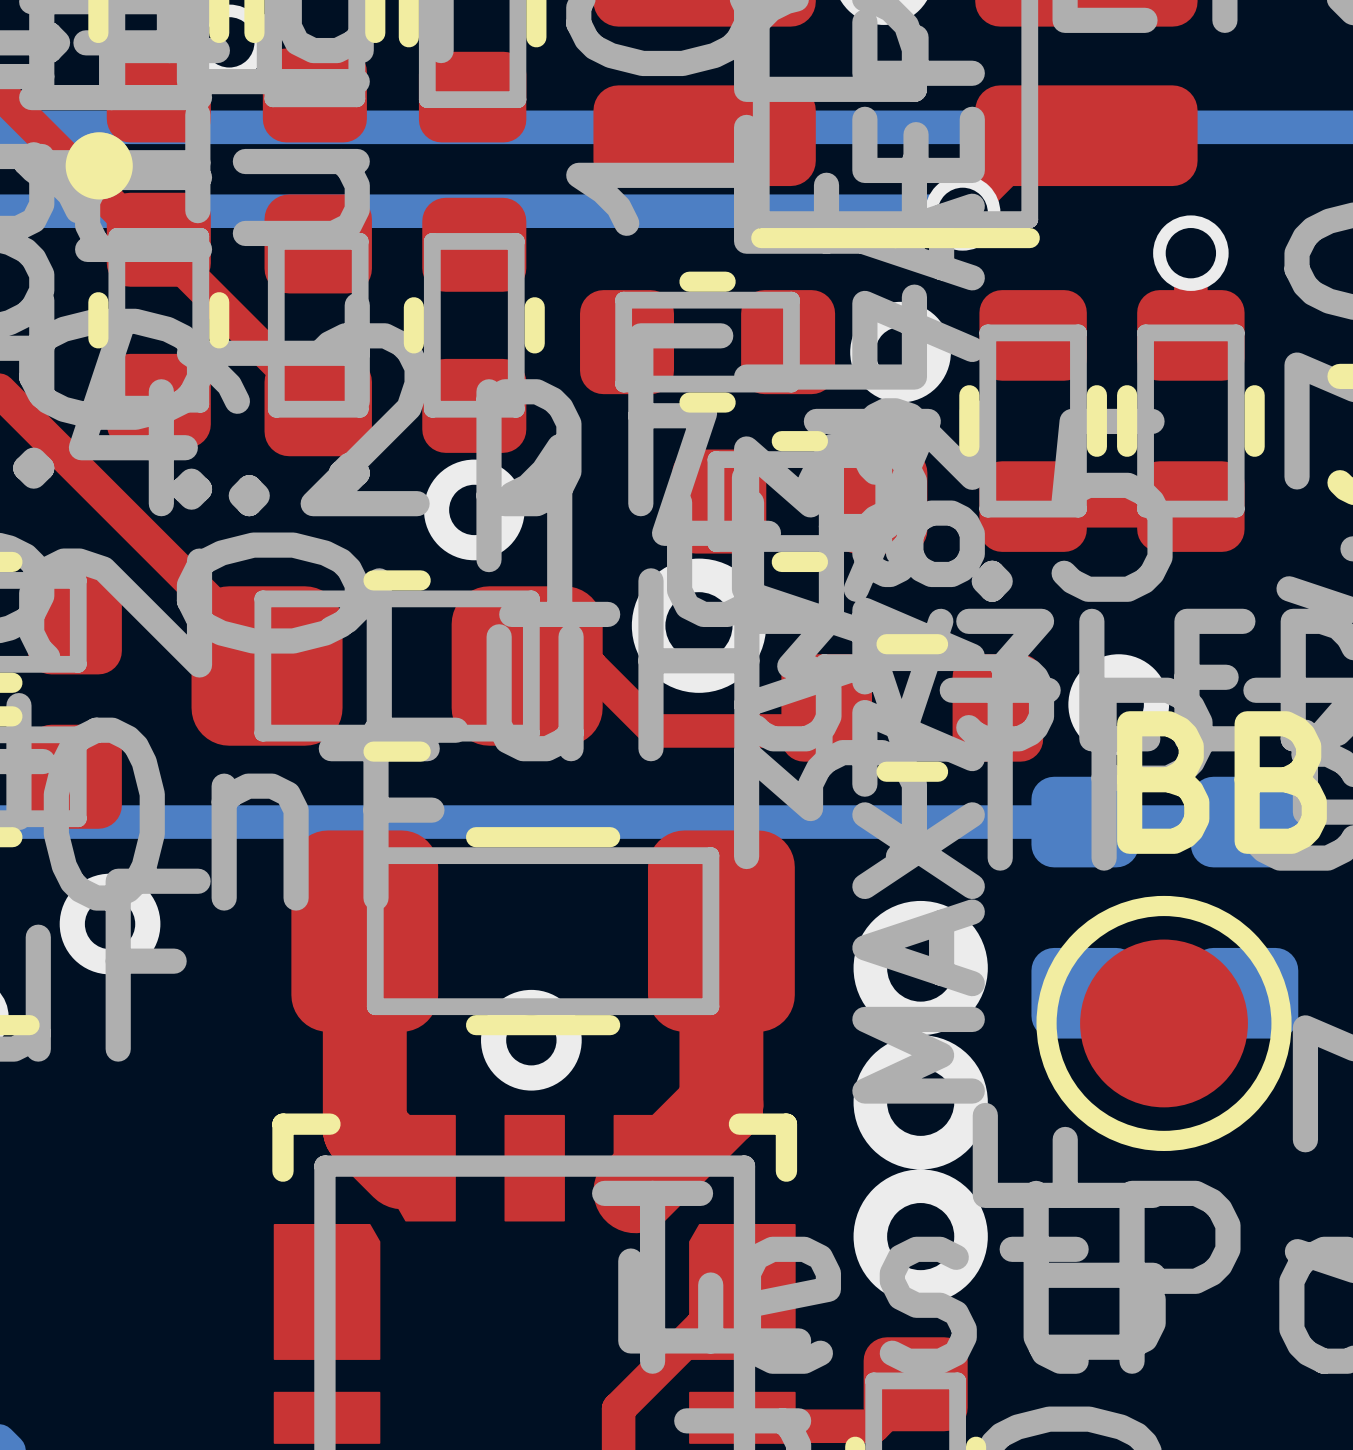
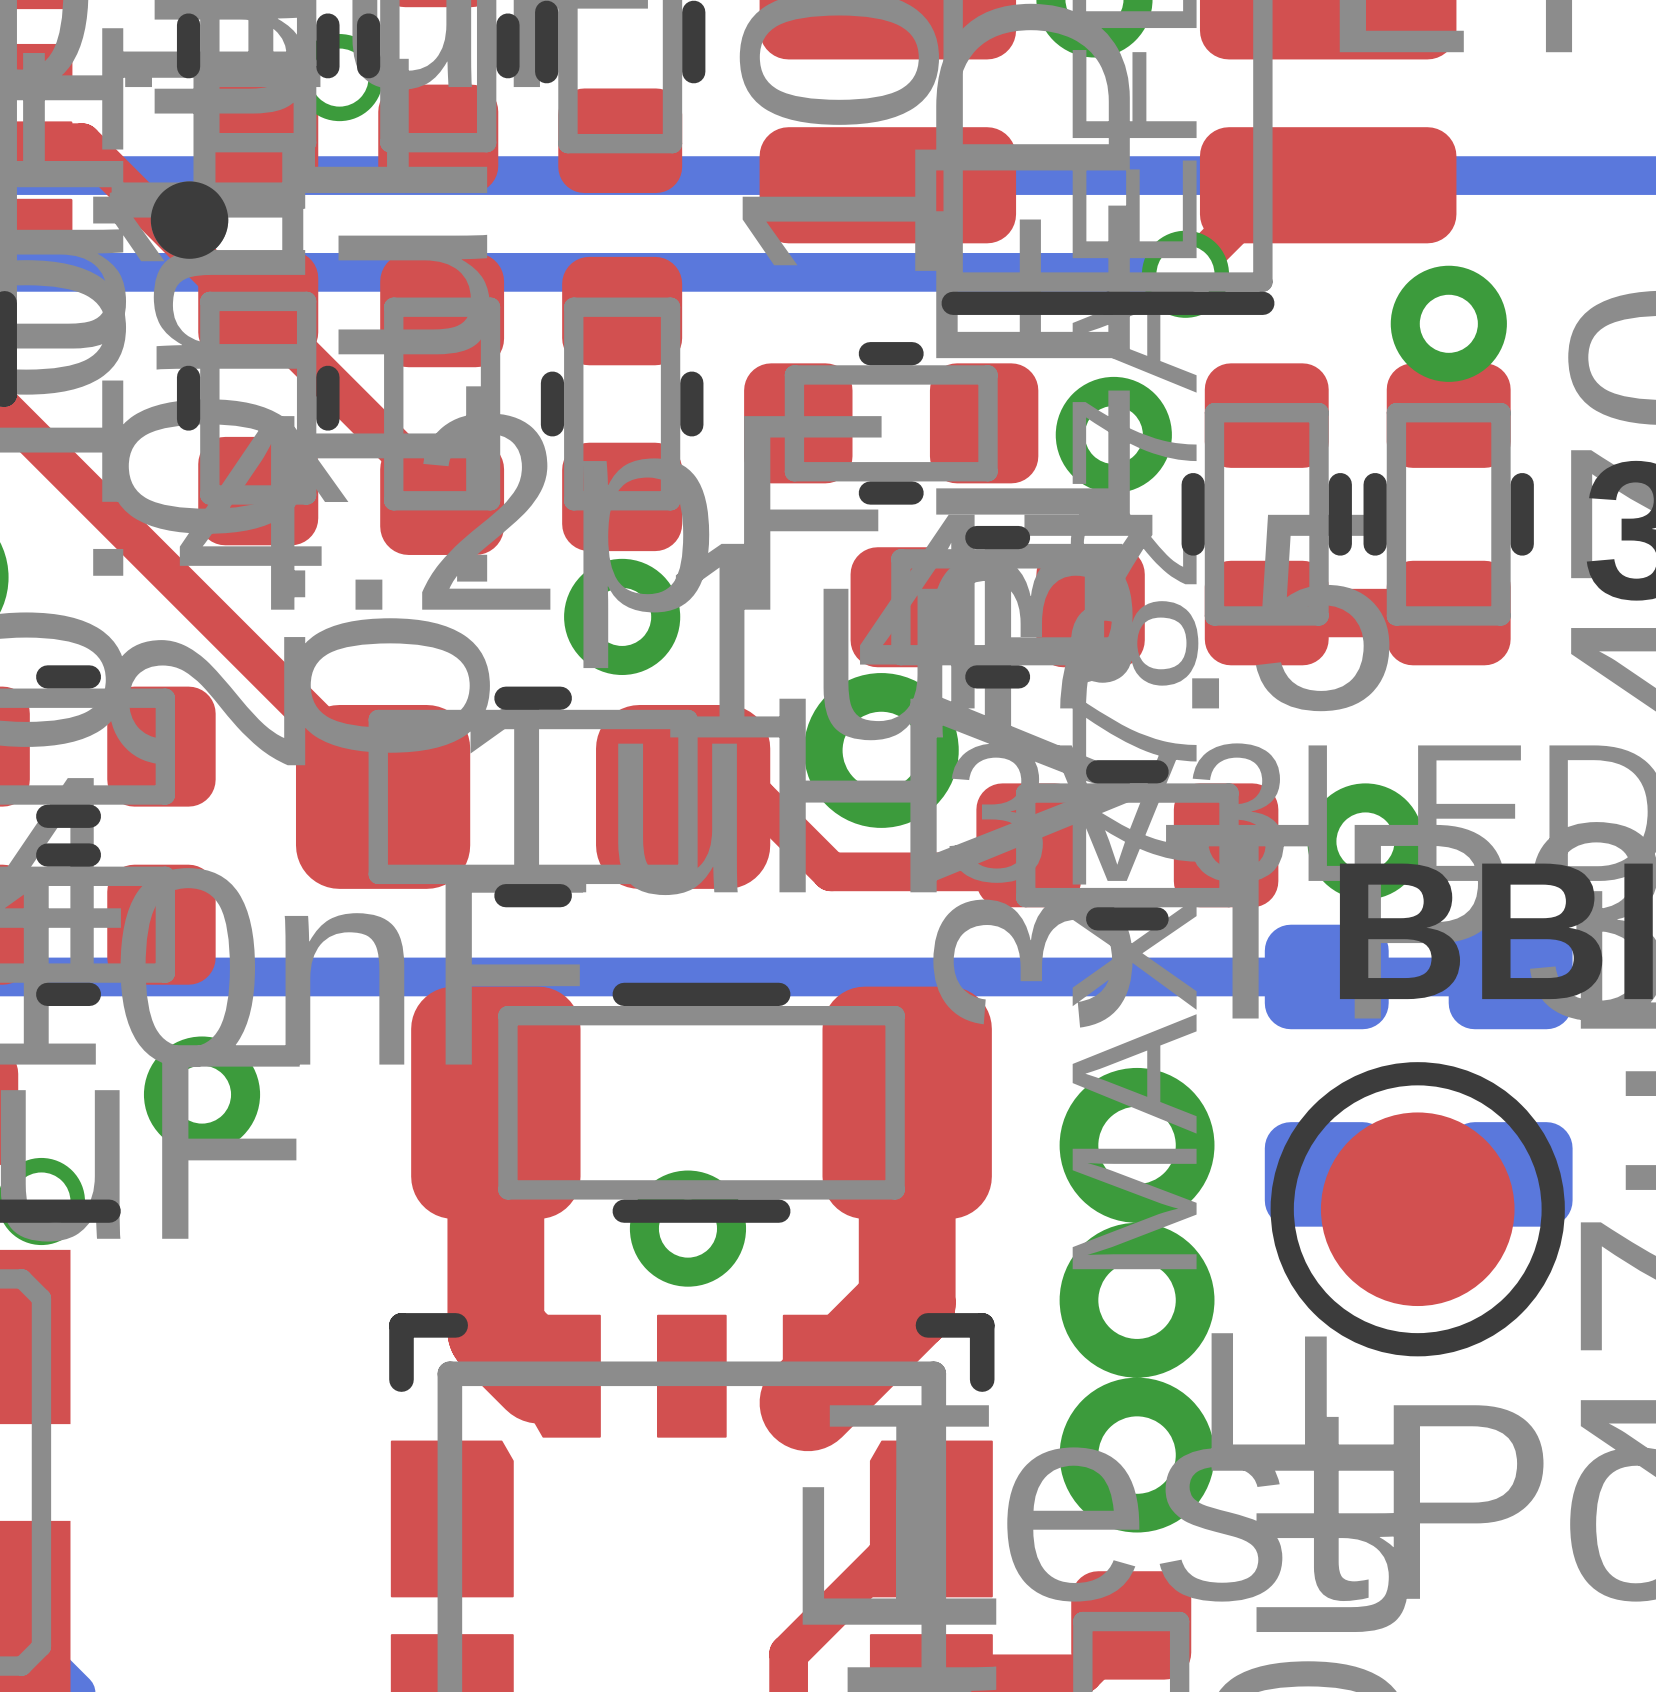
via size: [1153, 215, 1229, 291] -> [1390, 265, 1507, 382]

